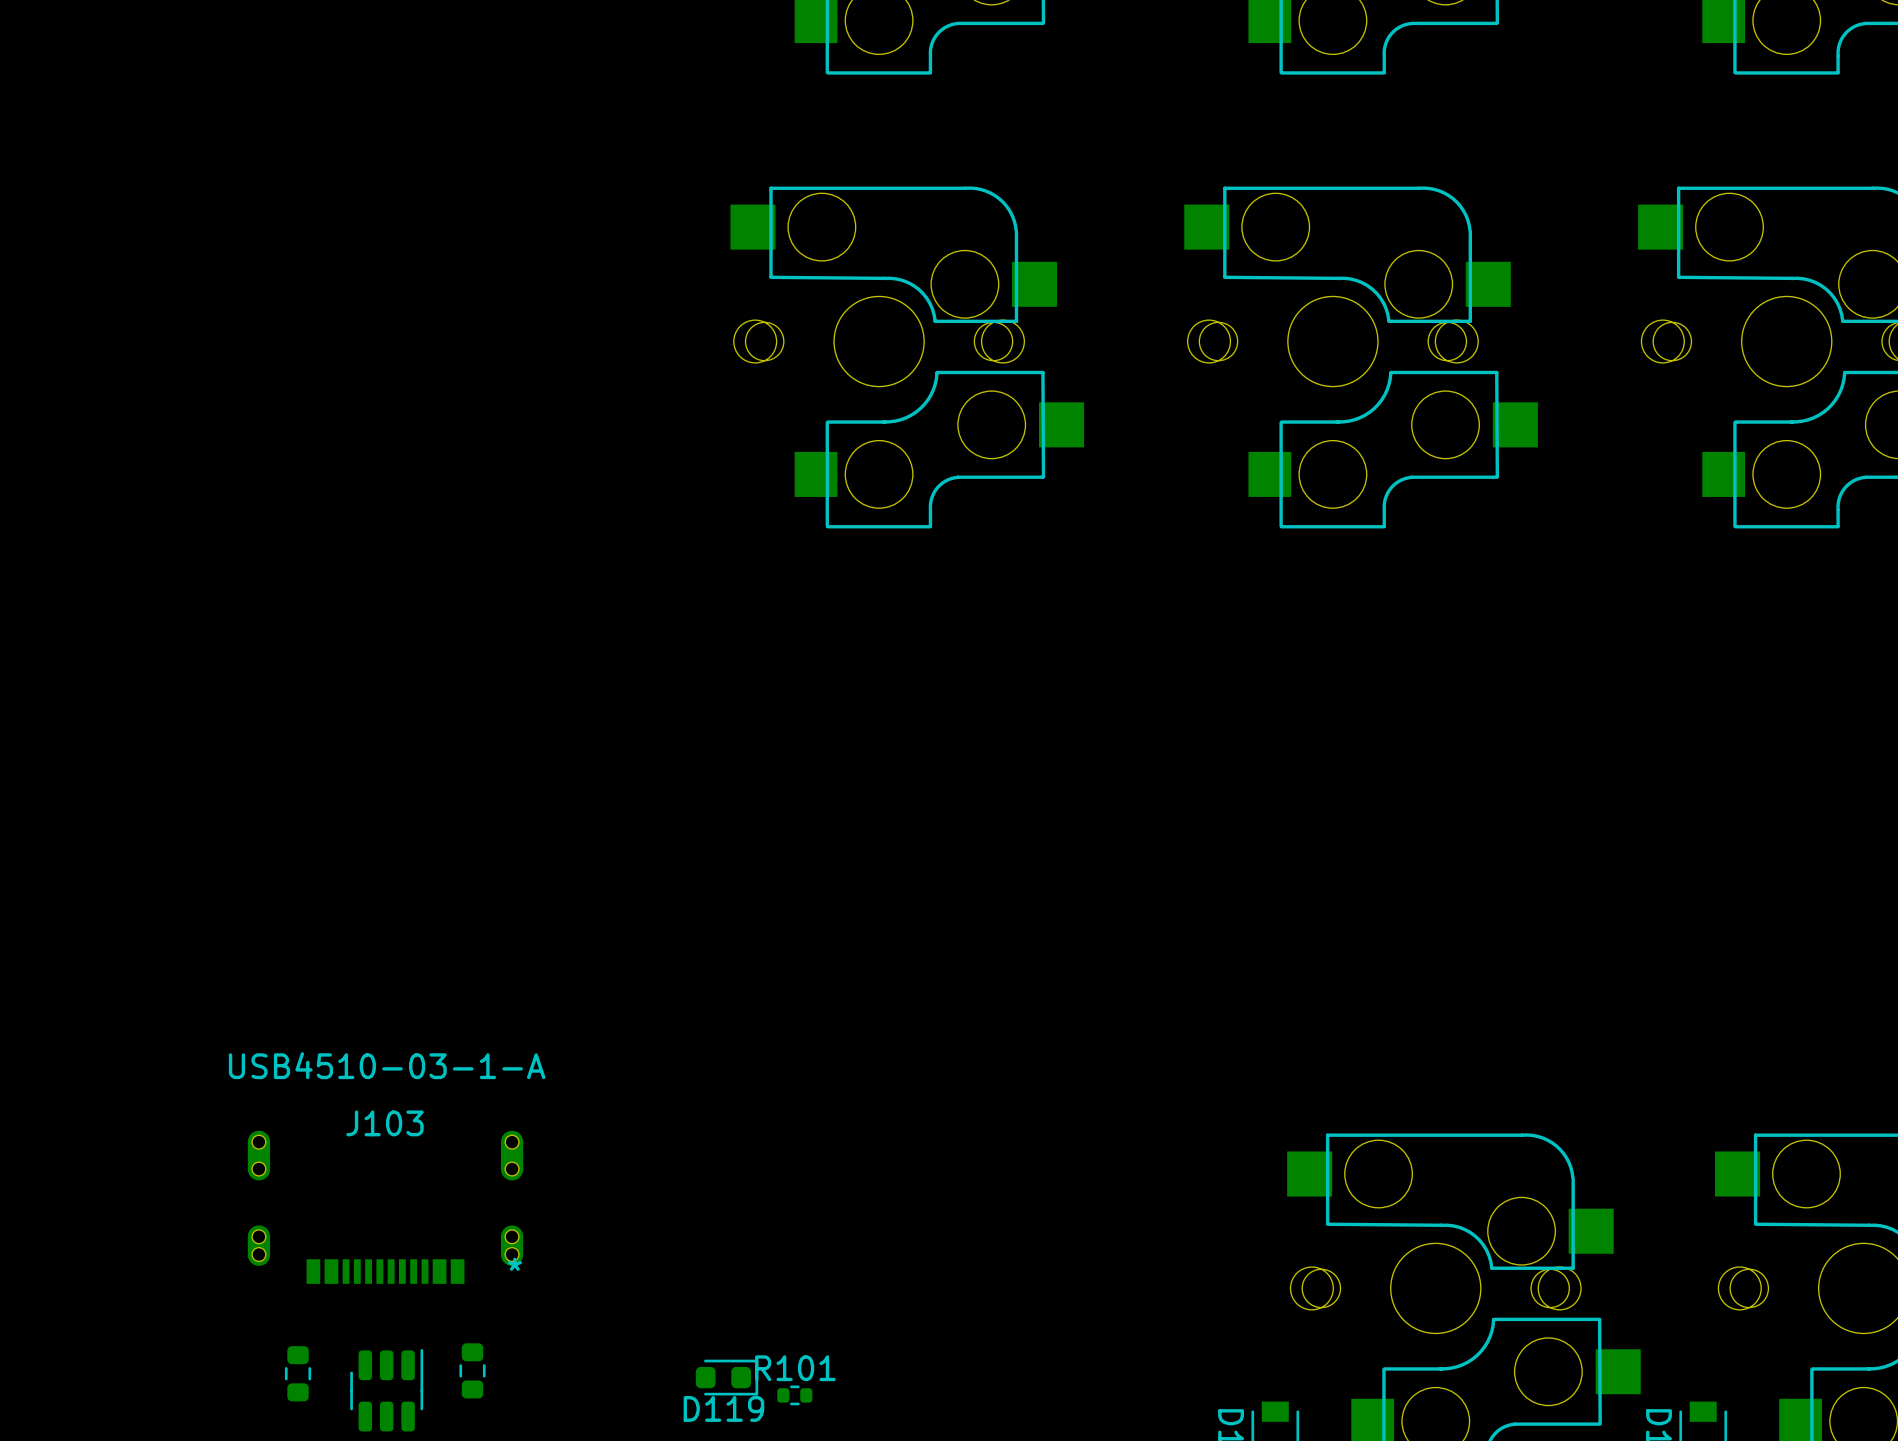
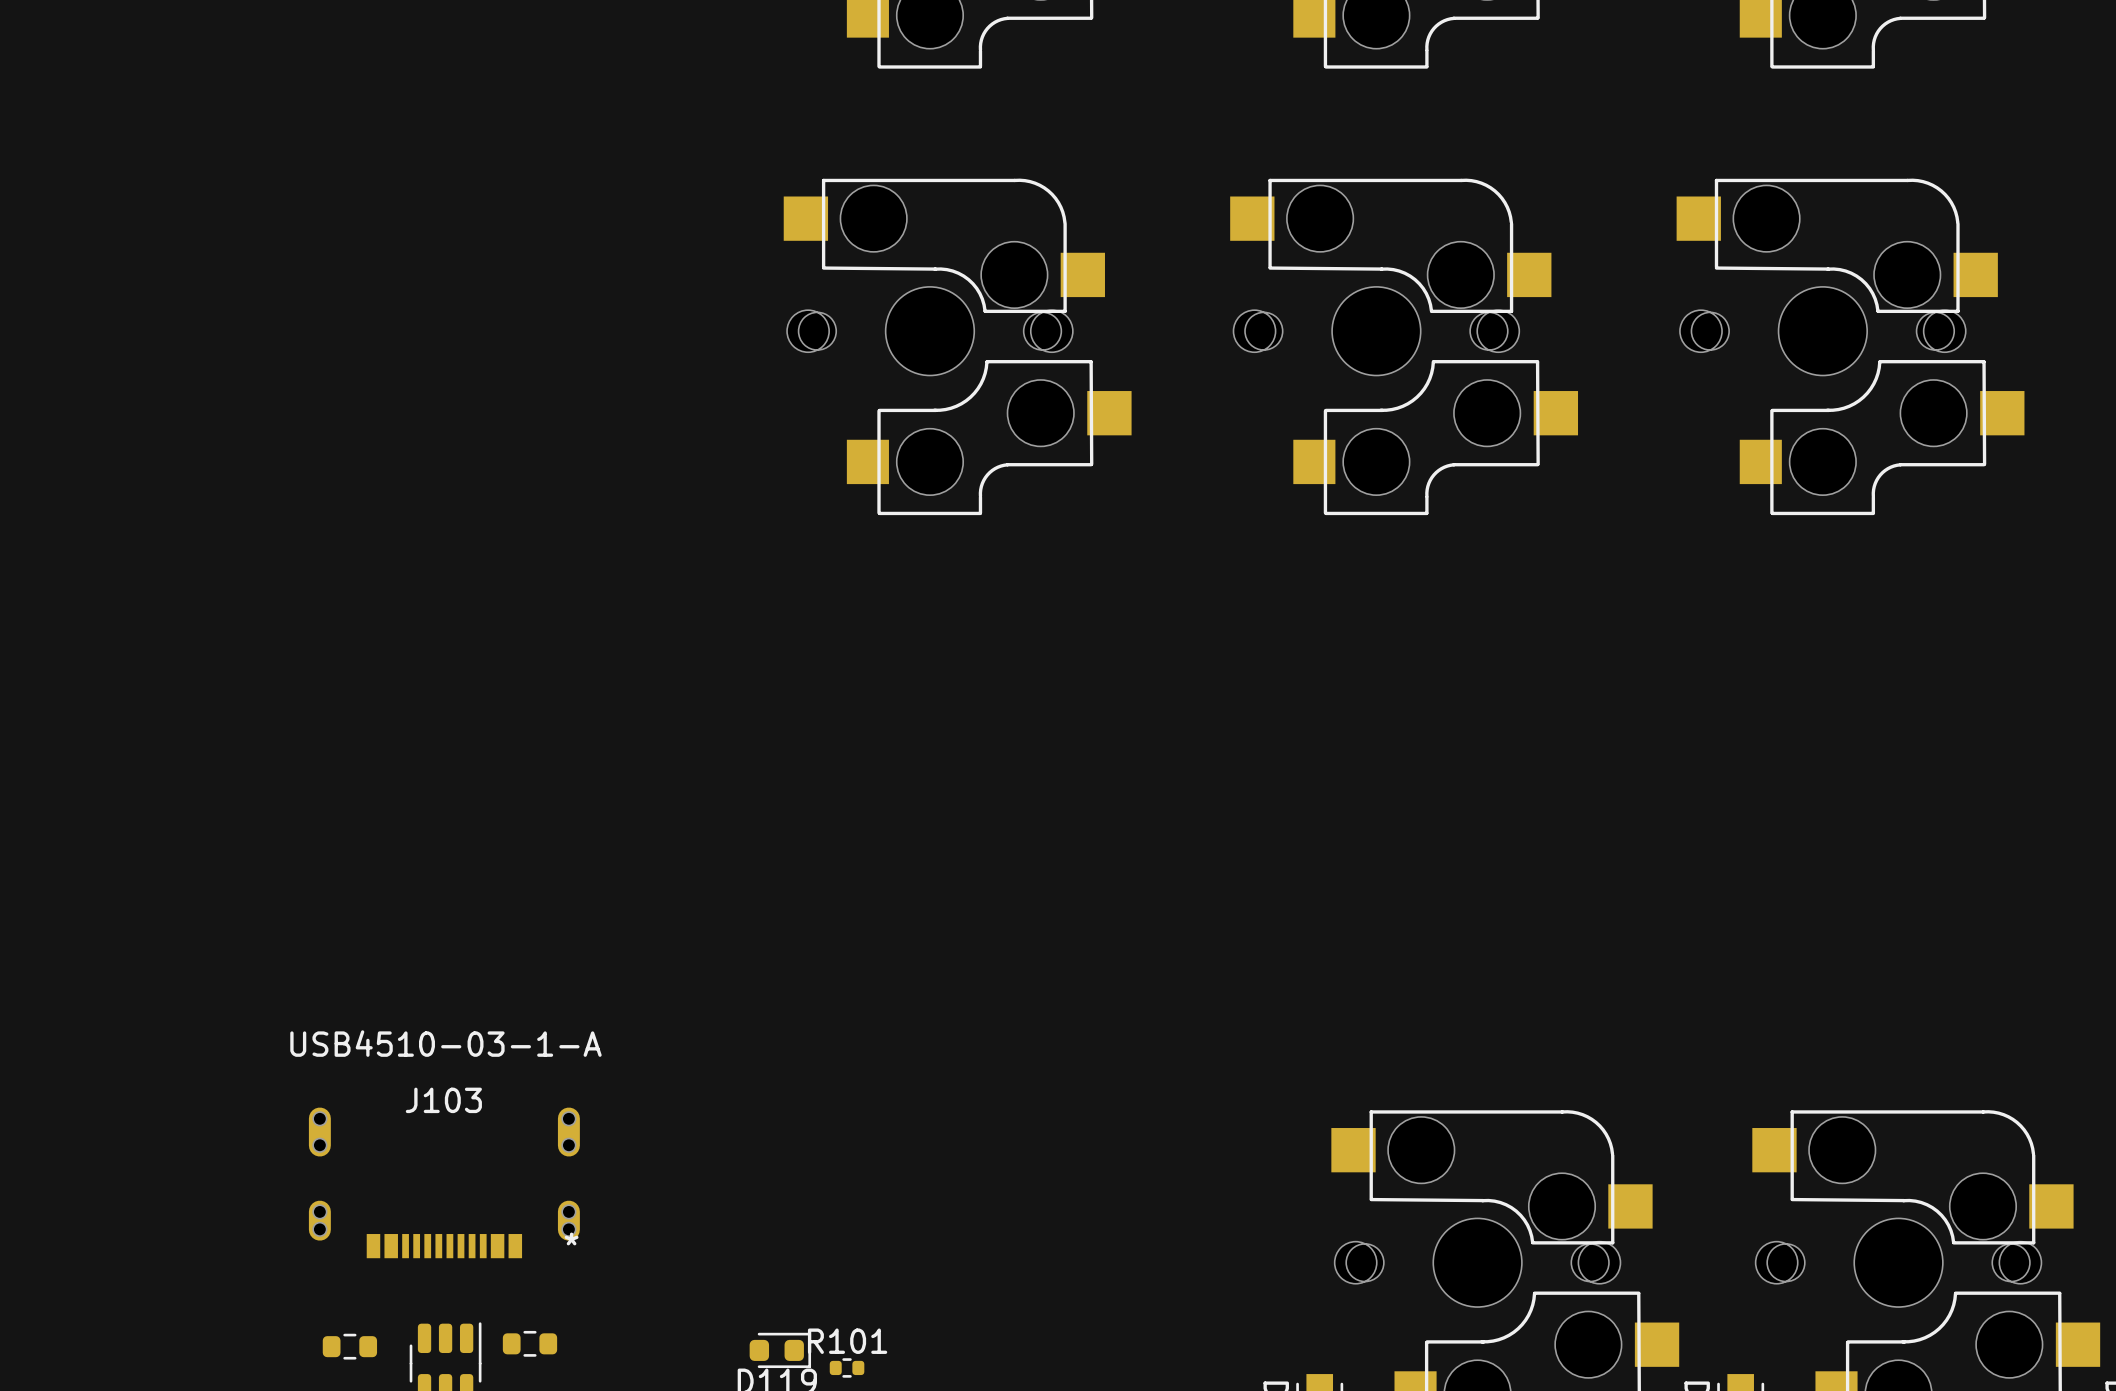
part rotation: 0° (472, 1370) -> 90° clockwise (529, 1343)
part rotation: 0° (298, 1373) -> 90° clockwise (349, 1346)

